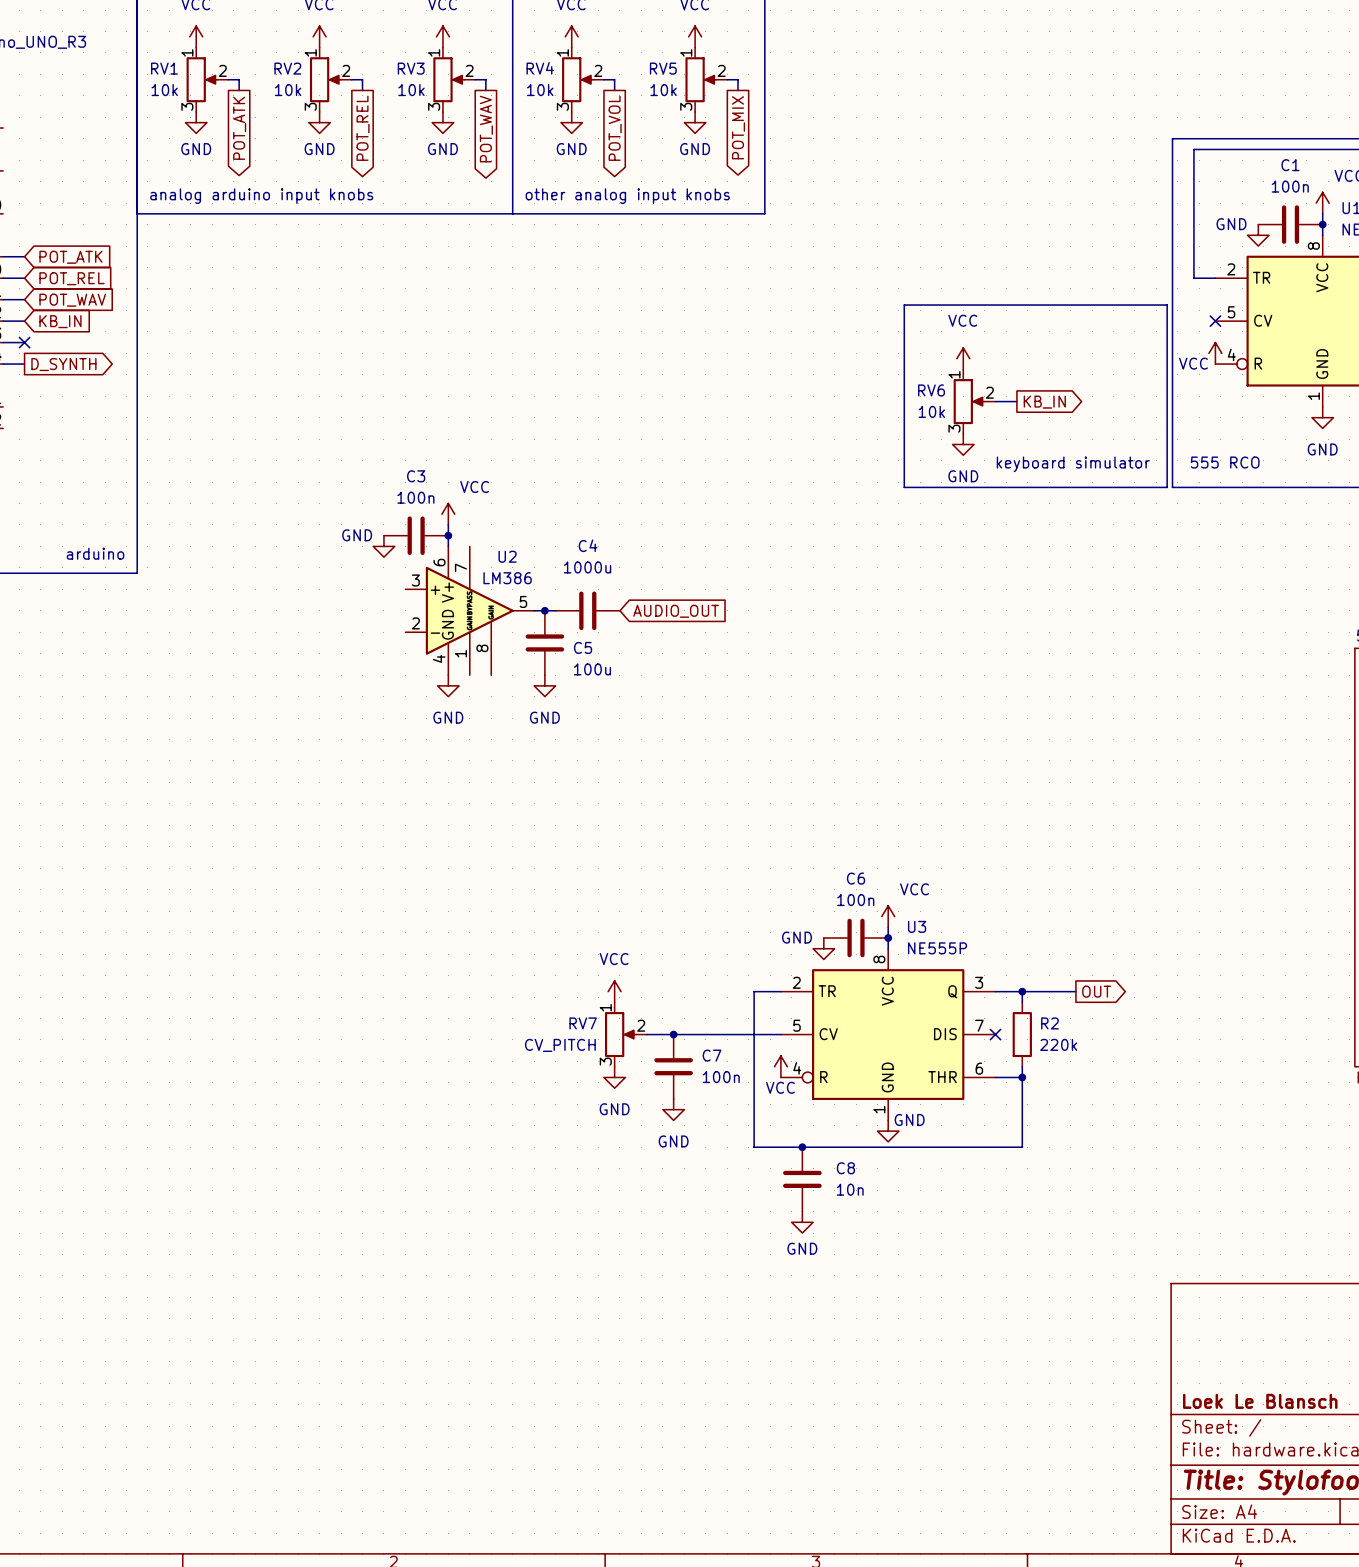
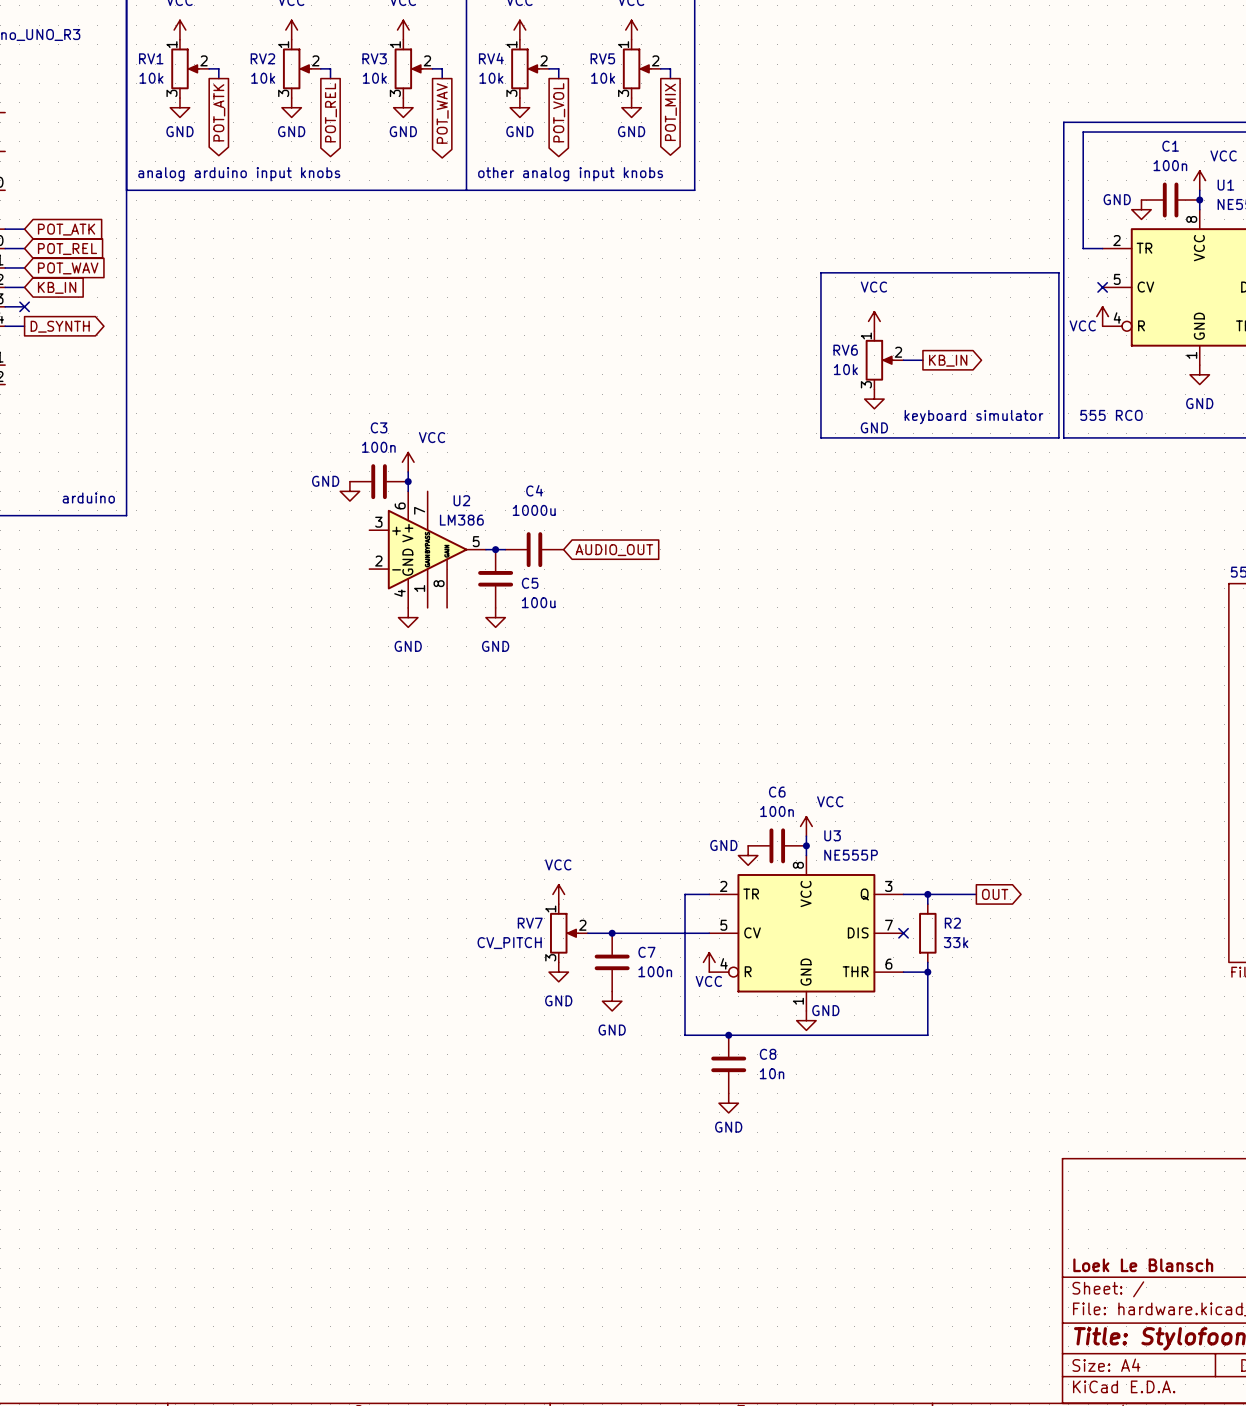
R2 value: 220k (1058, 1044) -> 33k (956, 942)

